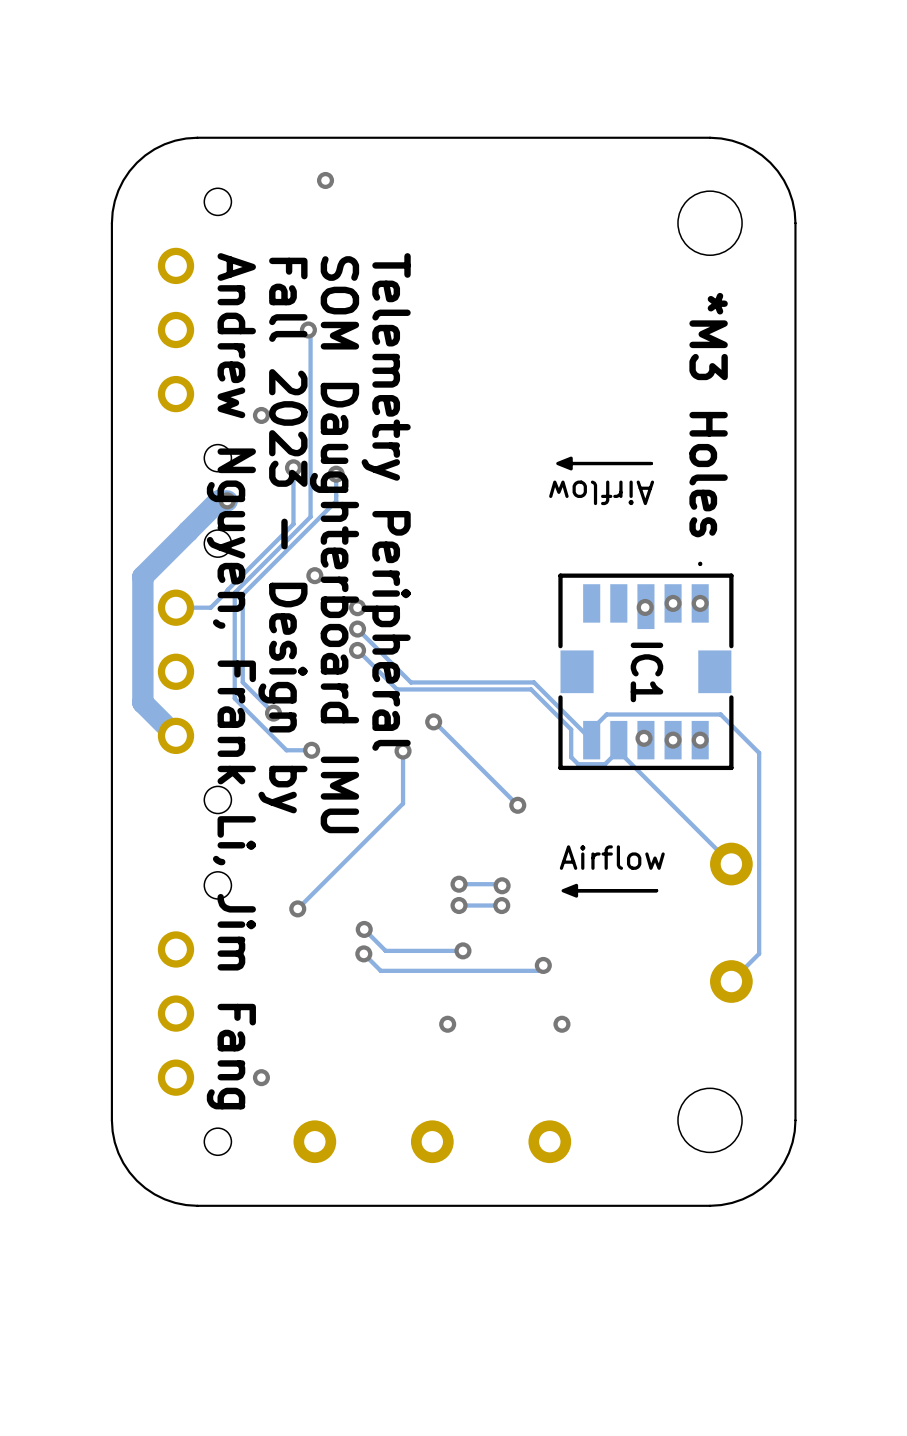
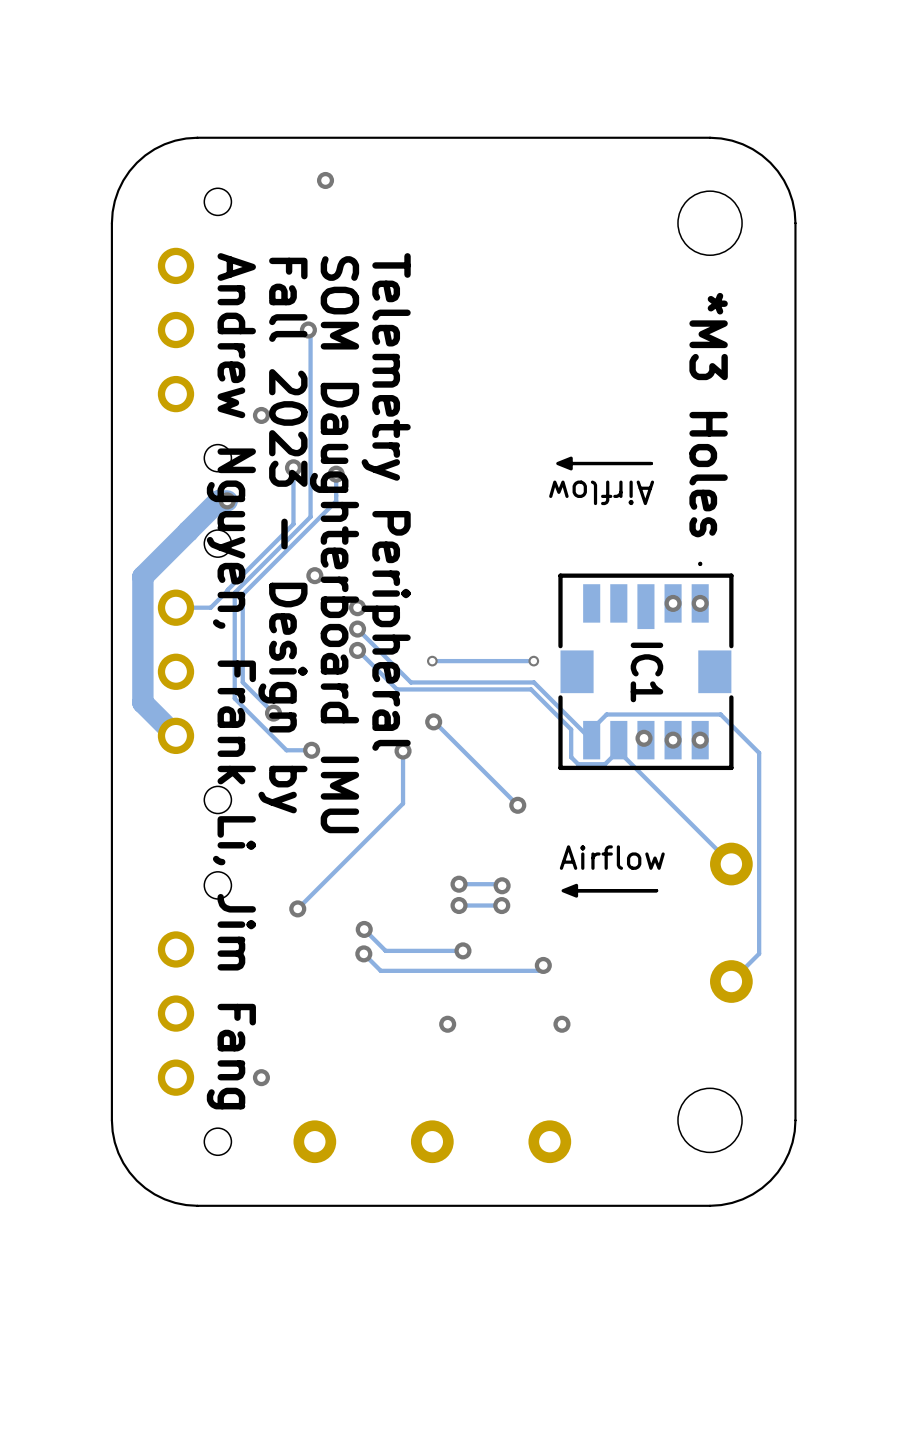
via: (645, 607) -> none
via: none -> (432, 661)
track: none -> (533, 661) (432, 661)
via: none -> (533, 661)

